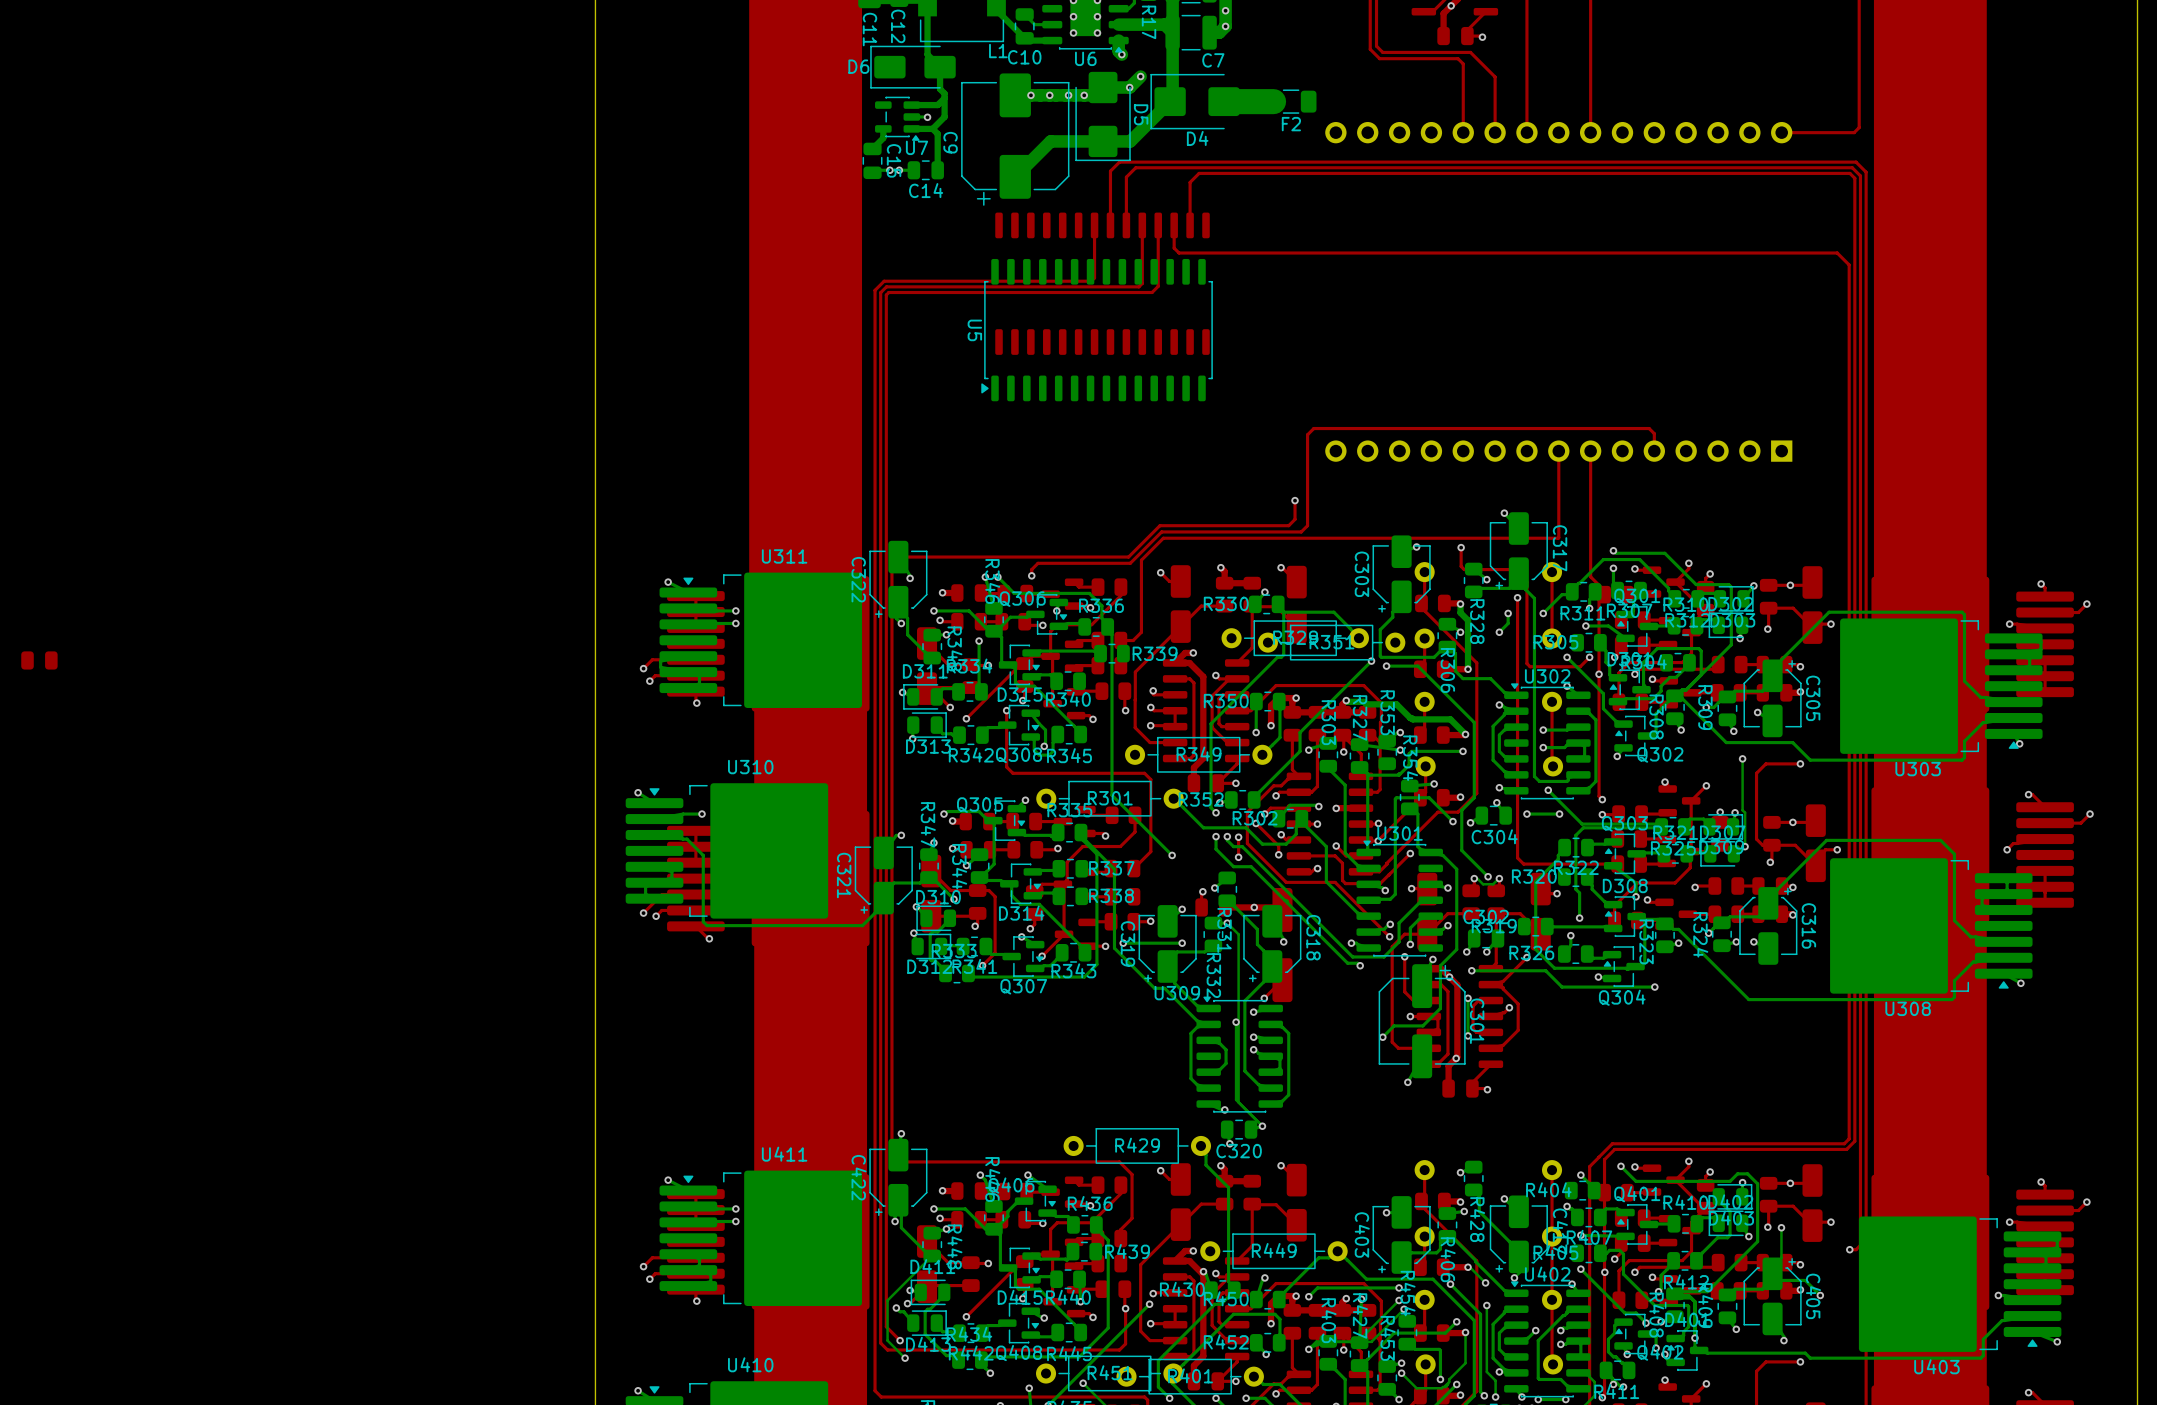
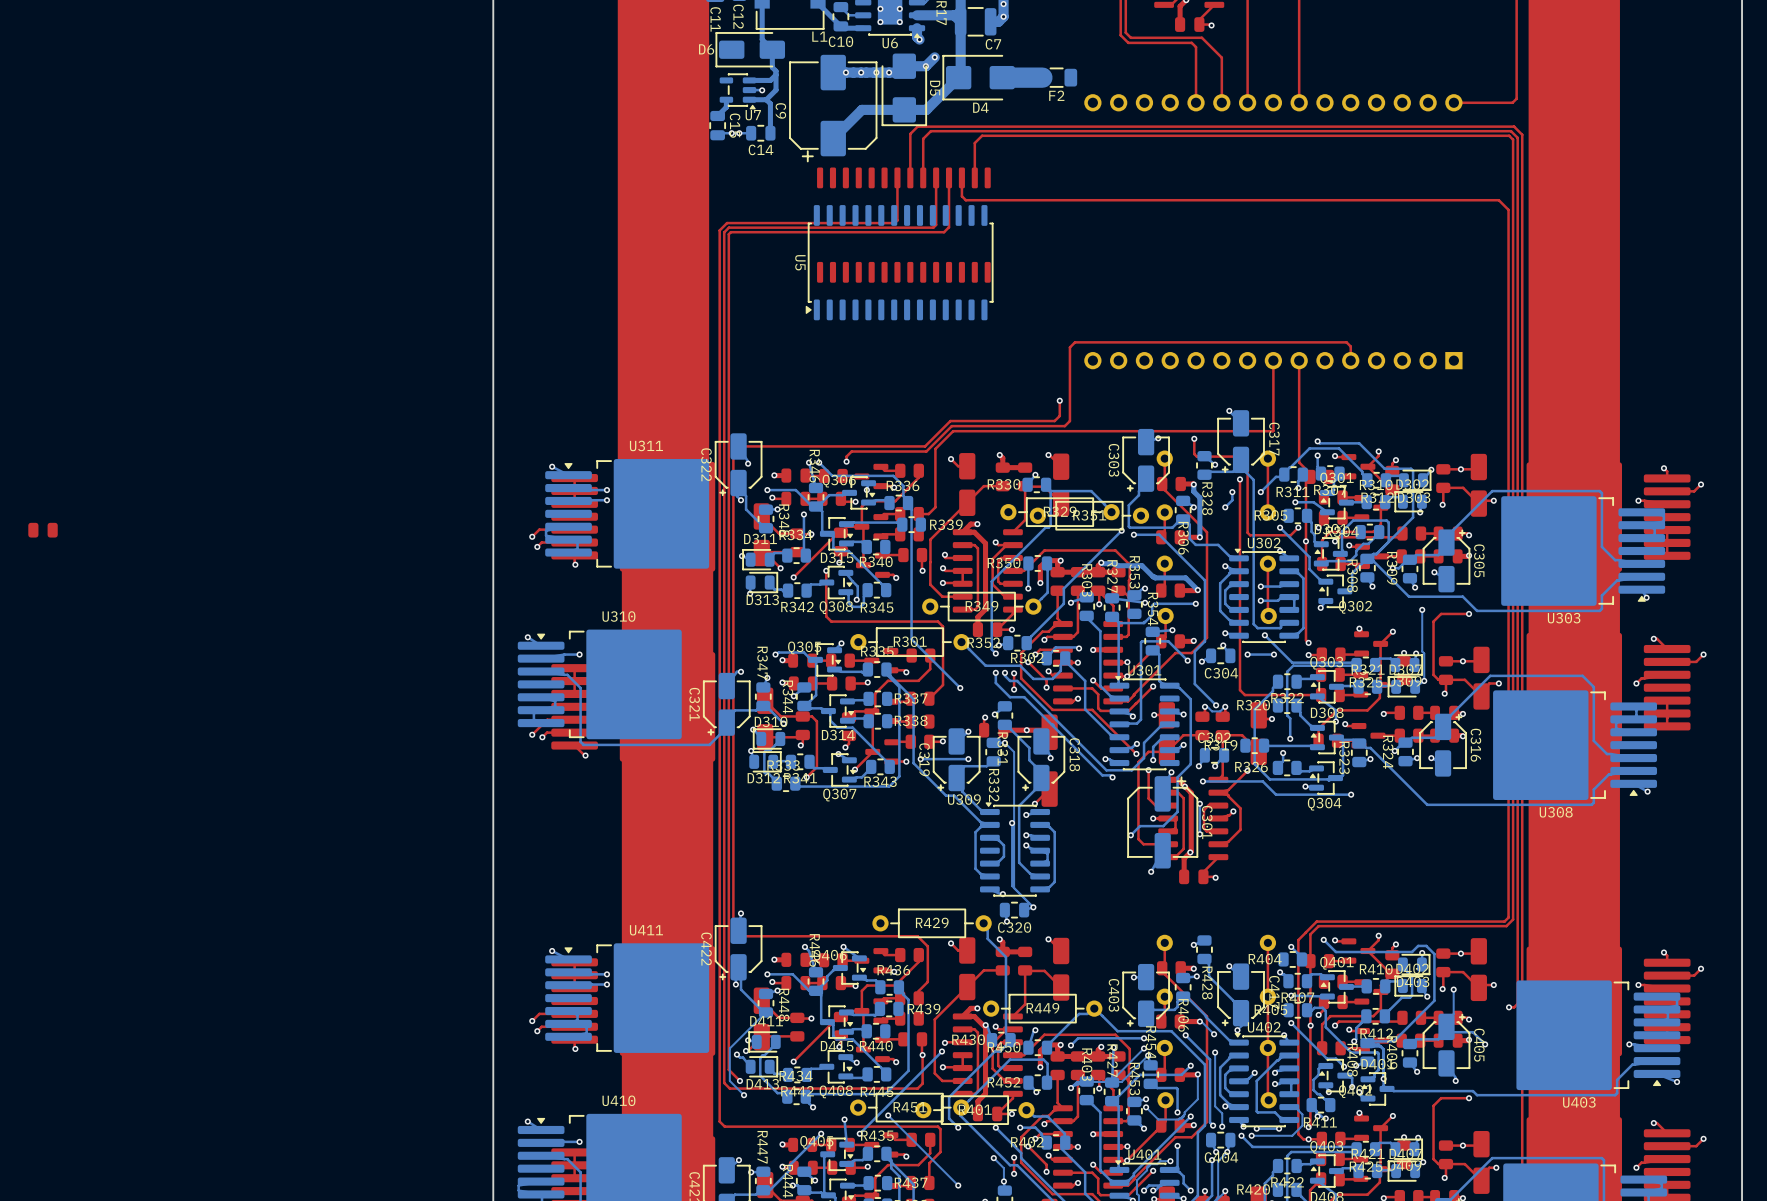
bottom track: (1079, 1279) (1080, 1301) -> none
via: (1080, 1301) -> none

